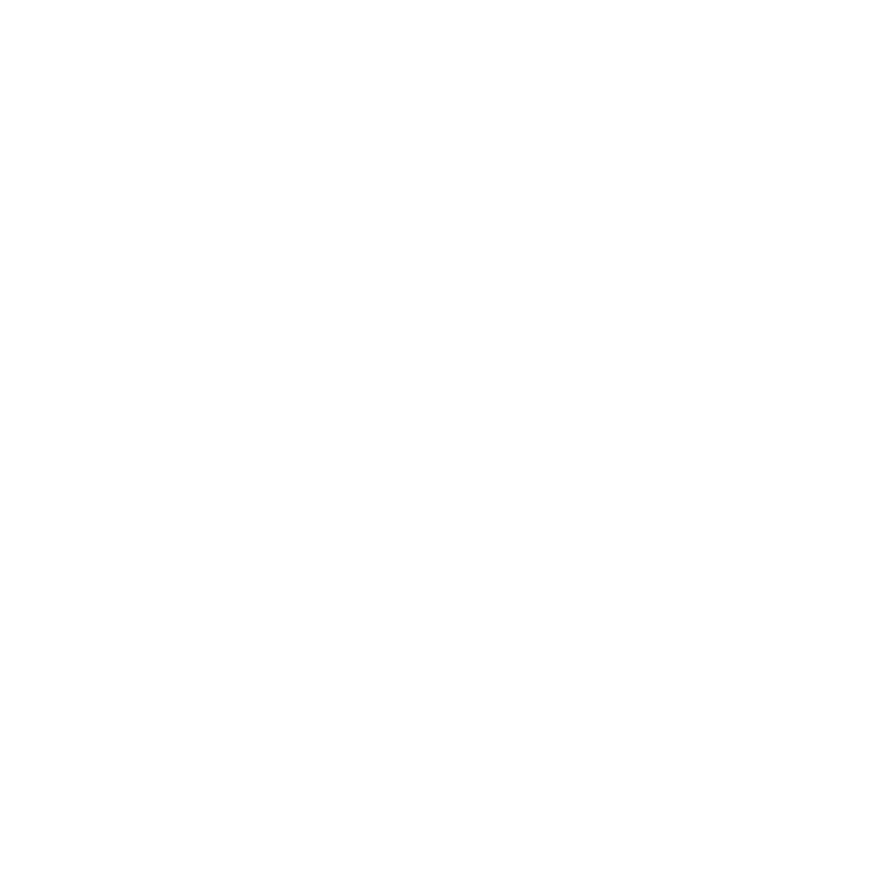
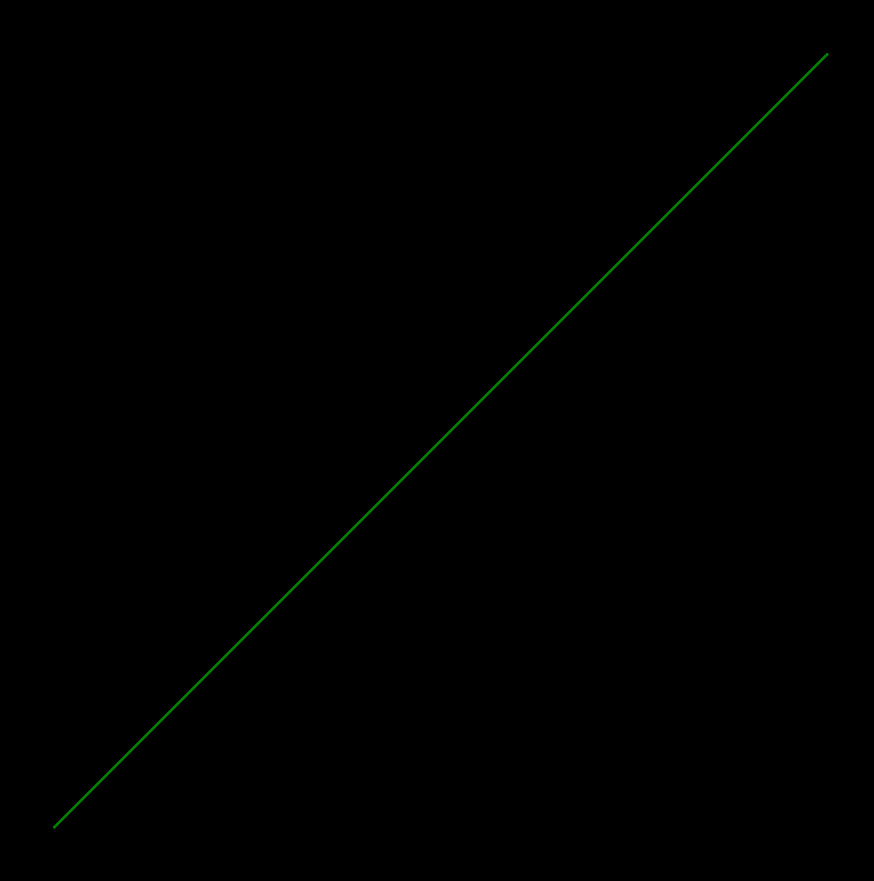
track: none -> (827, 54) (54, 827)

